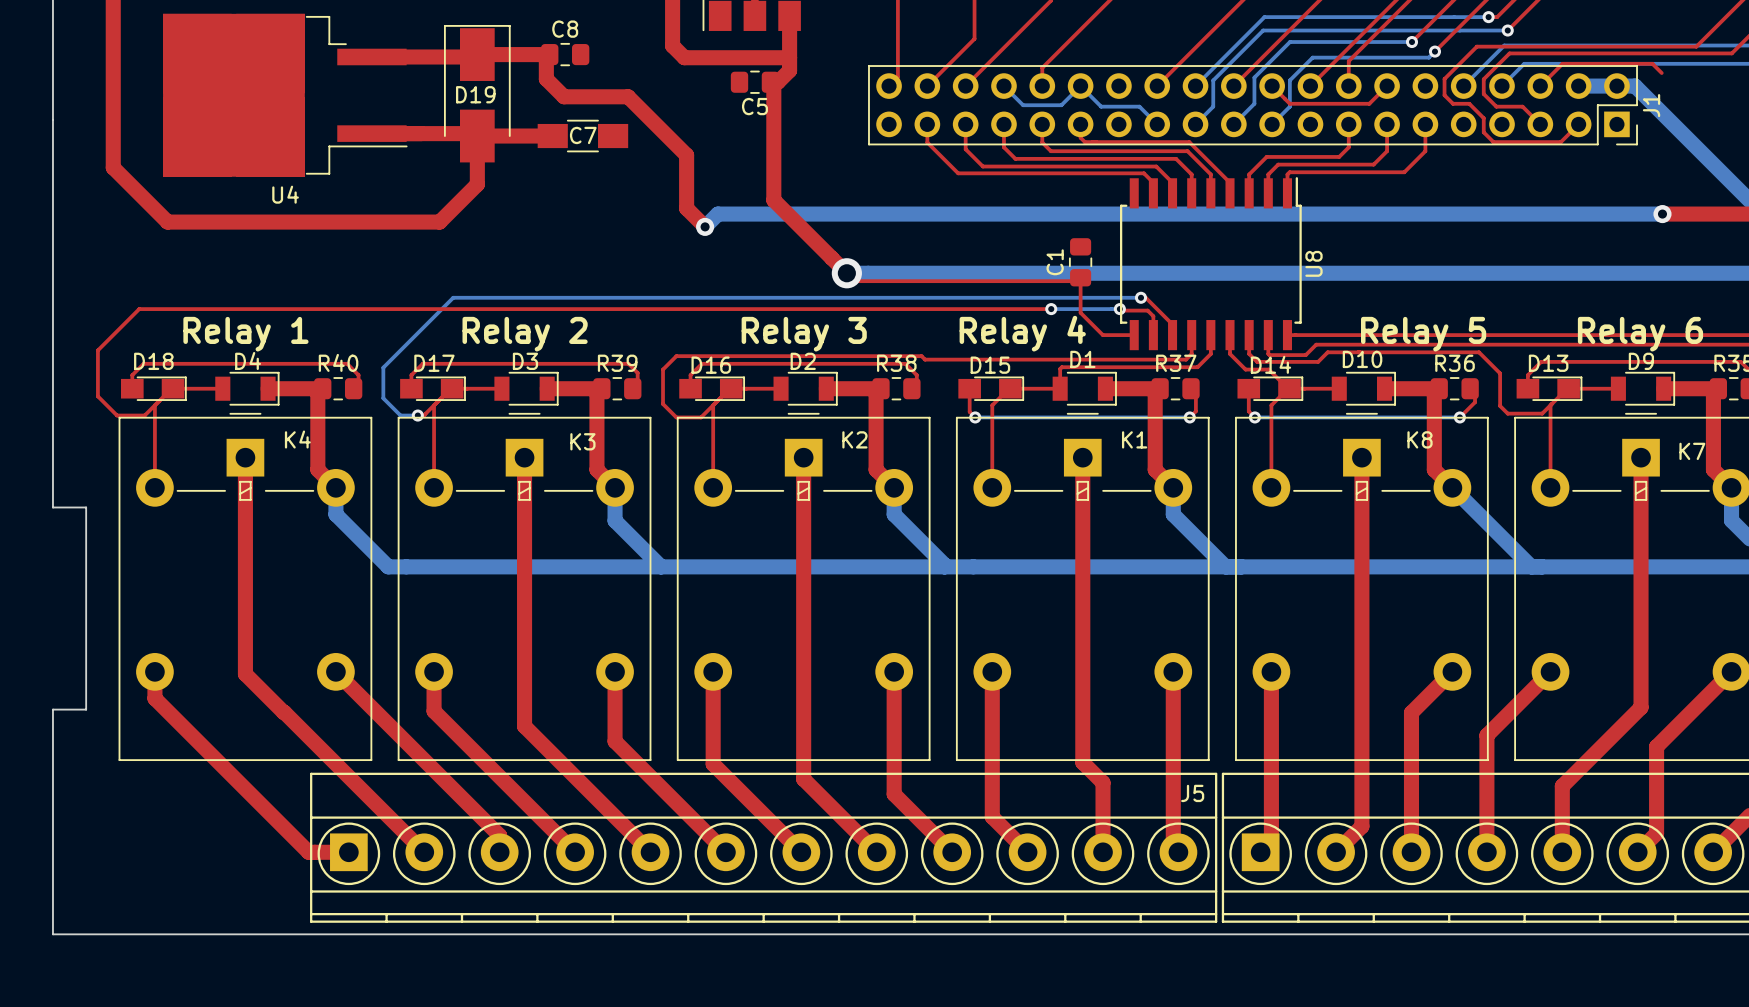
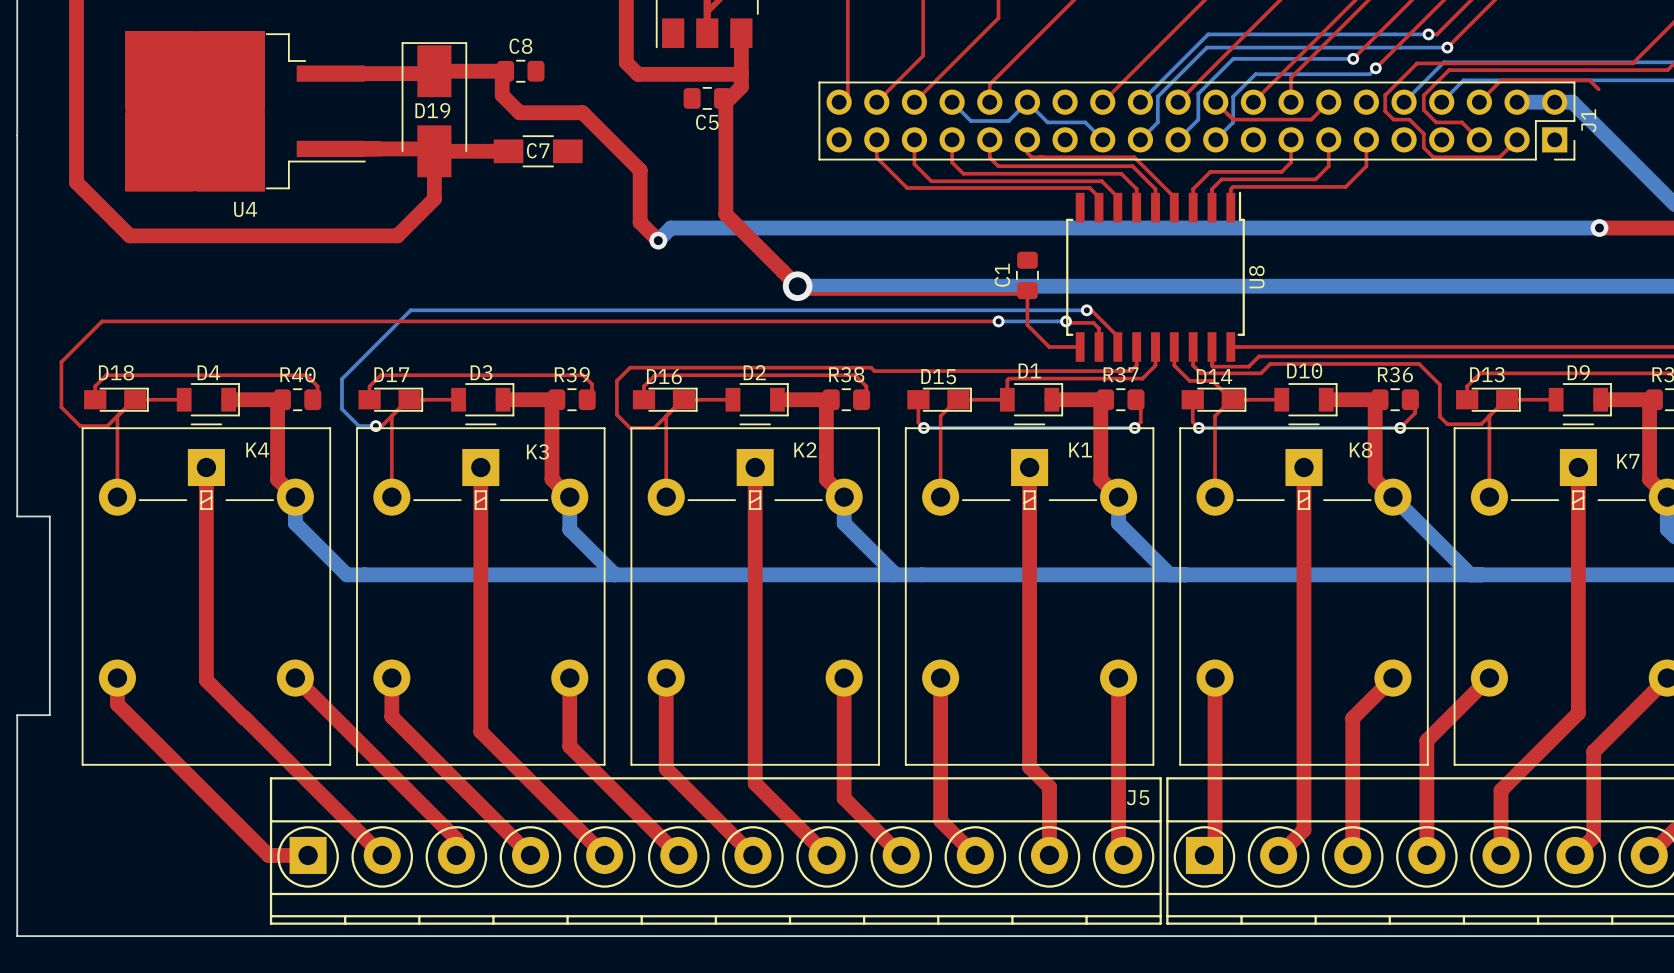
text: Relay 4 (1022, 333) -> none
text: Relay 1 (245, 334) -> none
text: Relay 2 (525, 334) -> none
text: Relay 3 (804, 334) -> none
text: Relay 5 (1423, 334) -> none
text: Relay 6 (1640, 334) -> none

